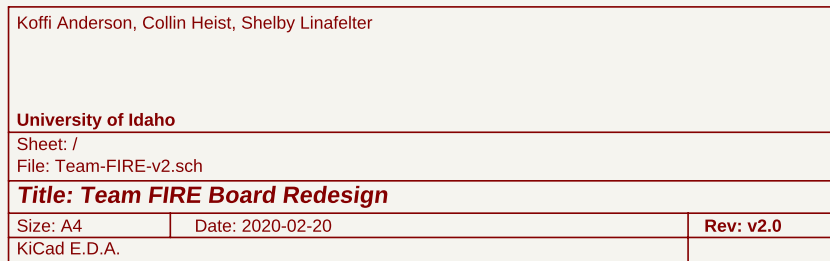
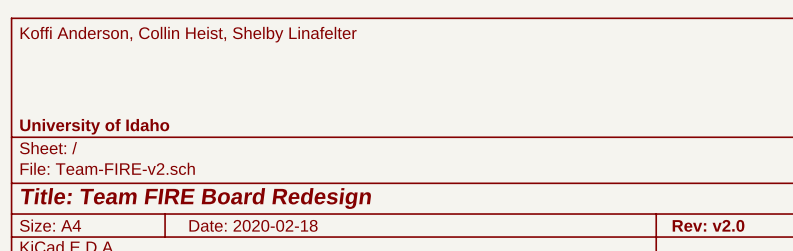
title block: Date: 2020-02-20 (263, 225) -> Date: 2020-02-18 (253, 225)

